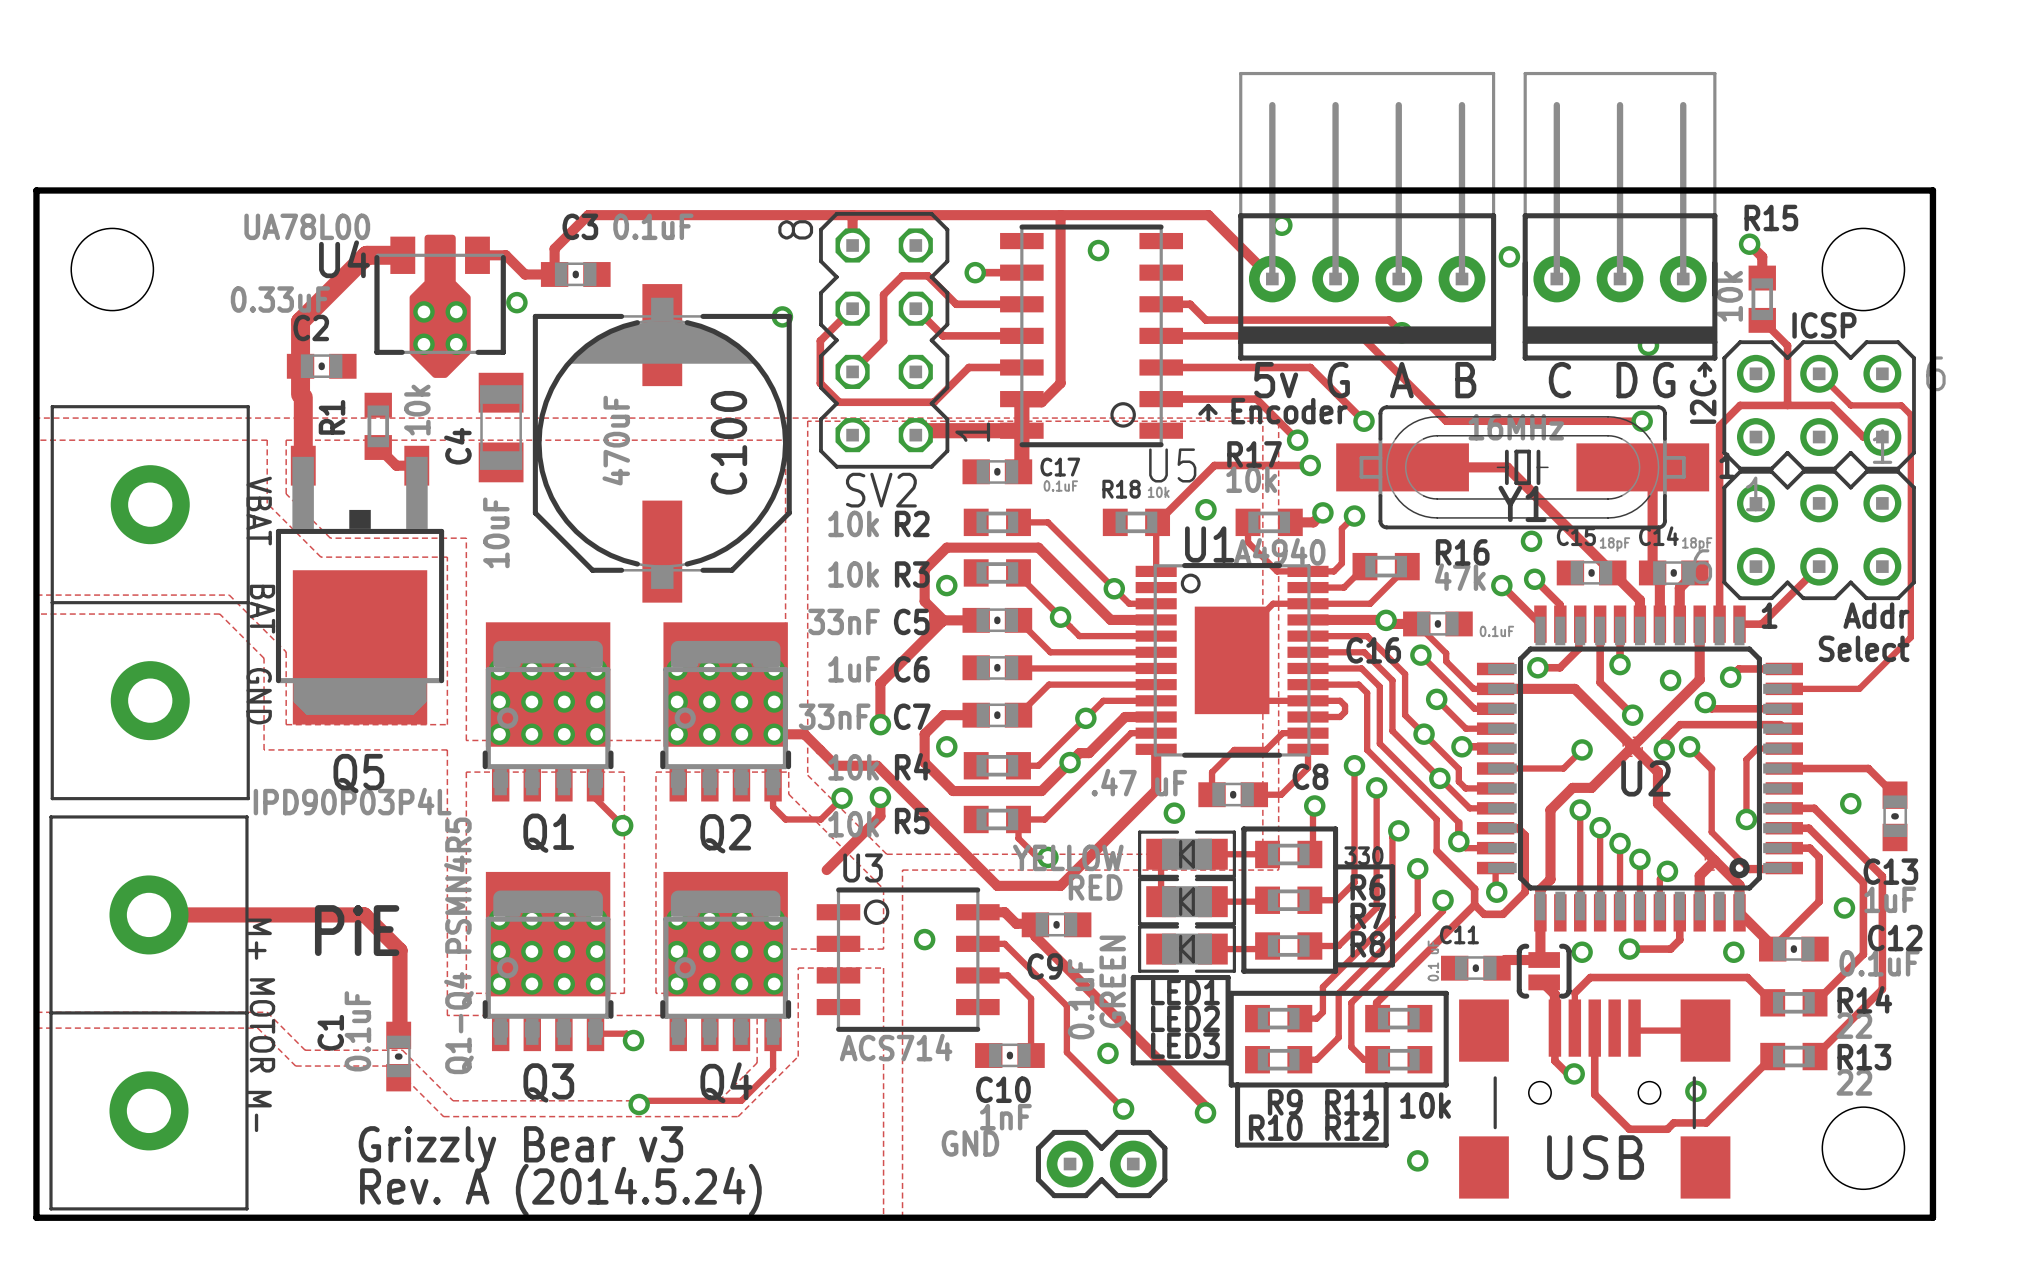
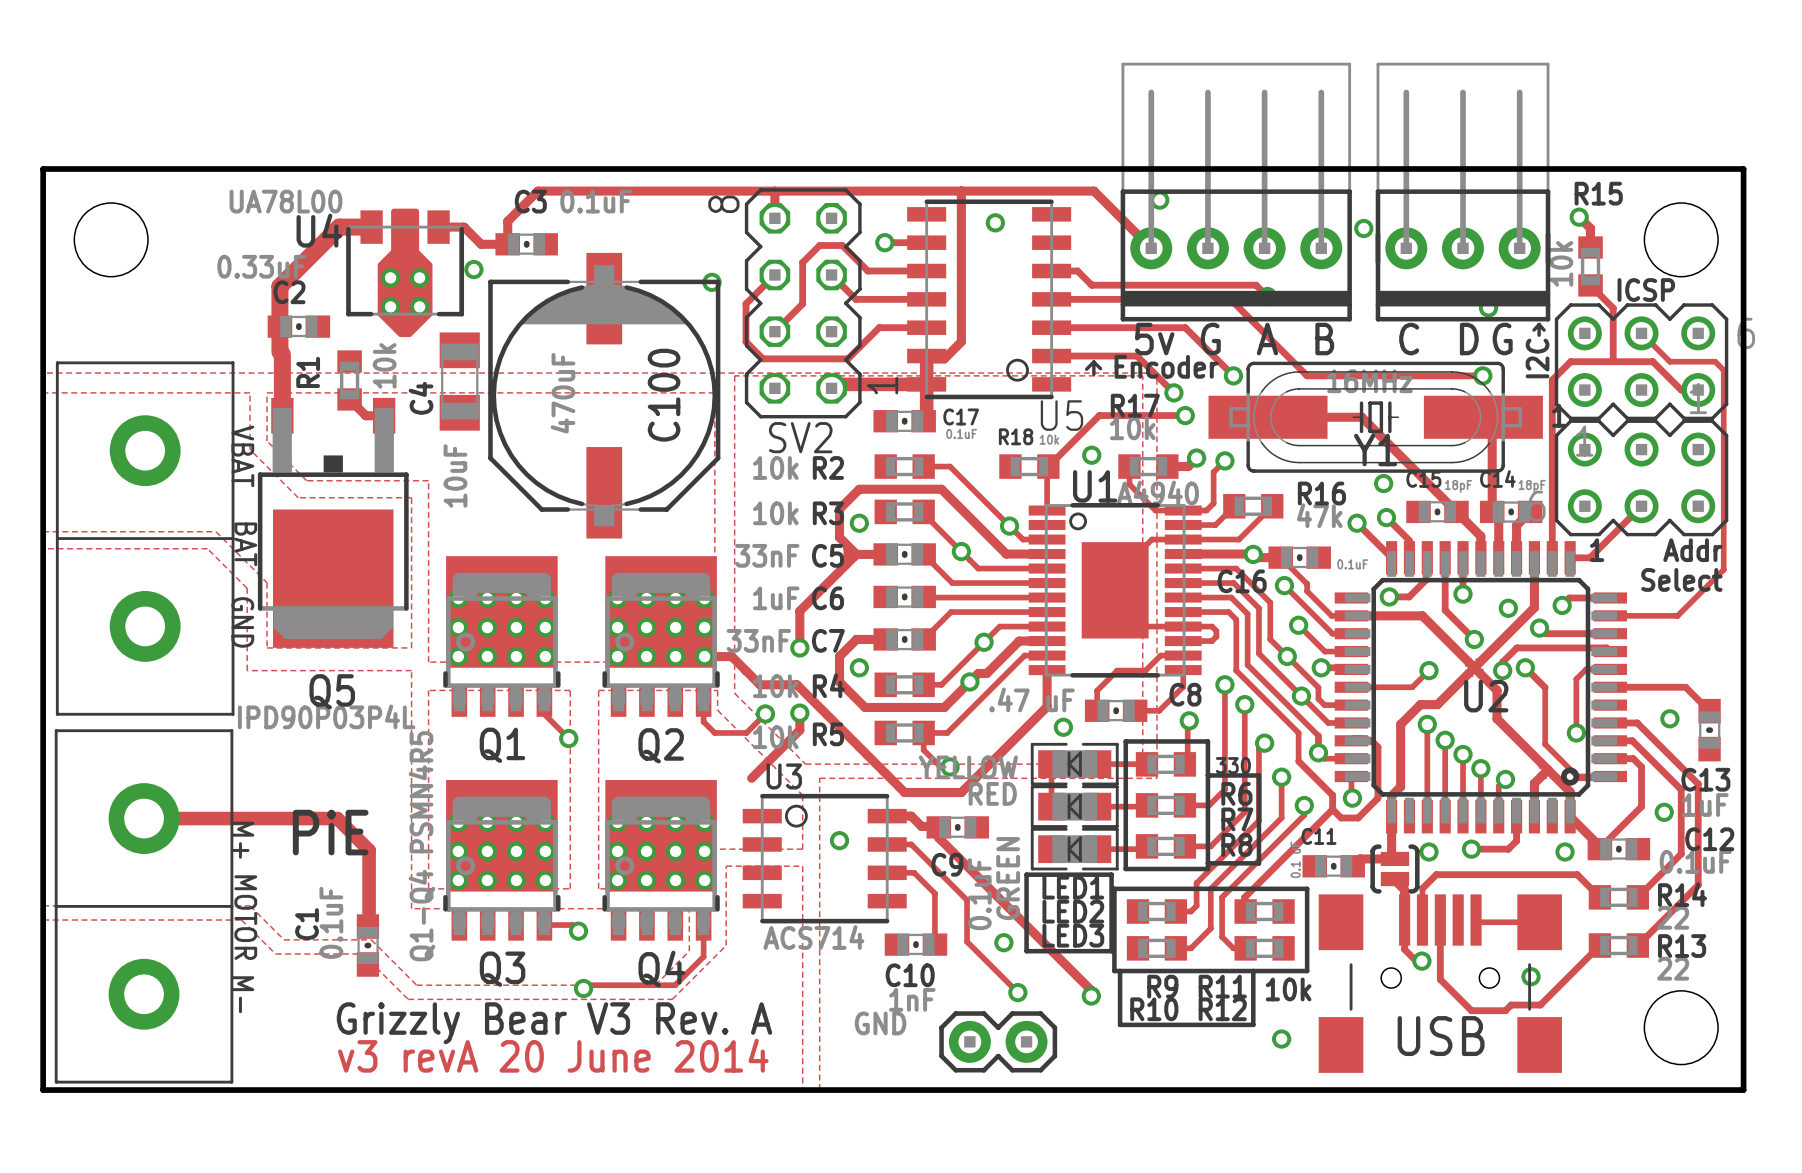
text: Grizzly Bear v3 (520, 1149) -> Grizzly Bear V3 Rev. A (554, 1023)
text: none -> v3 revA 20 June 2014 (553, 1055)
text: Rev. A (2014.5.24) (560, 1190) -> none

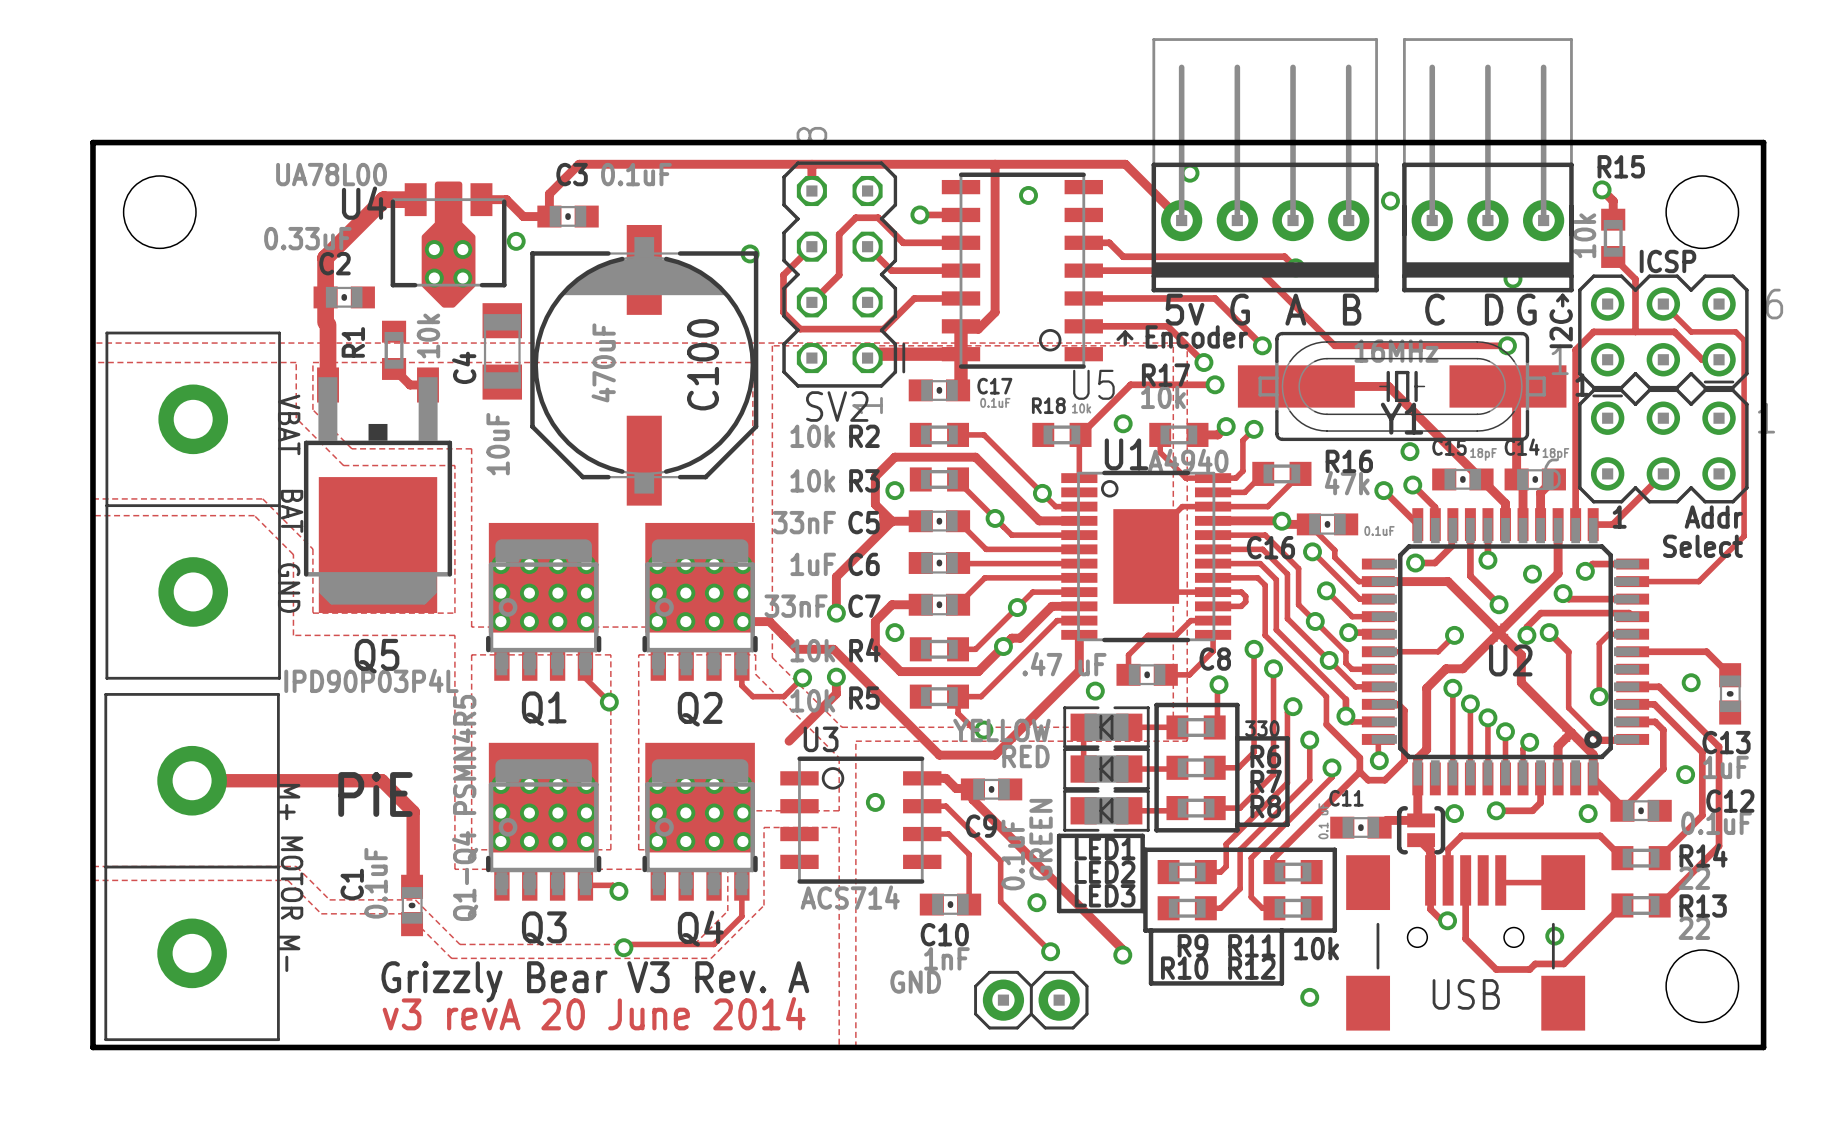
SV2 footprint: [744, 188, 862, 419] -> [782, 161, 906, 388]
part footprint: [1554, 303, 1729, 421] -> [1578, 274, 1749, 398]
part footprint: [1554, 419, 1729, 537] -> [1578, 380, 1749, 504]
part footprint: [1318, 894, 1562, 1073] -> [1346, 855, 1586, 1031]
part footprint: [939, 1011, 1058, 1073] -> [974, 970, 1089, 1030]

